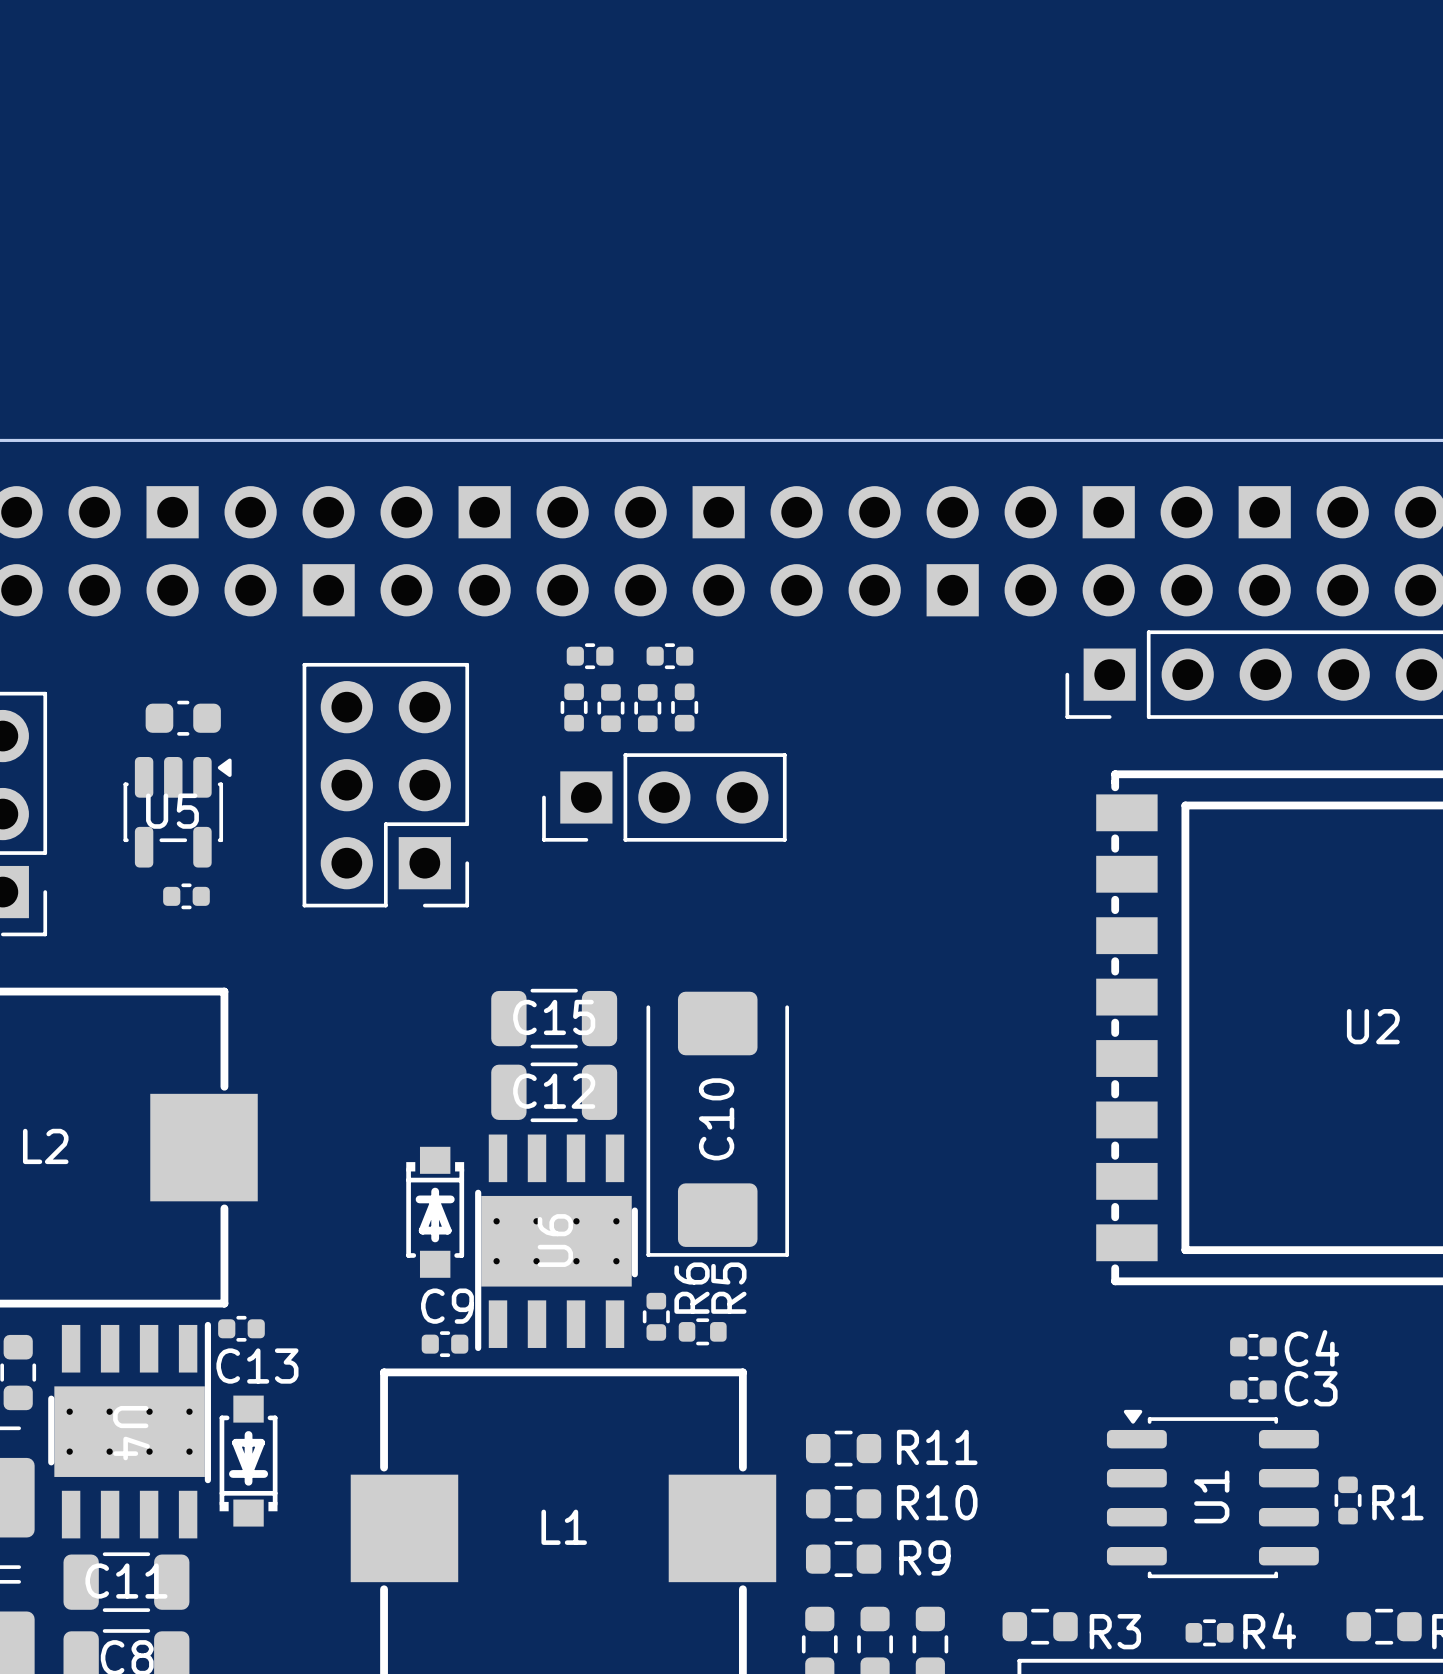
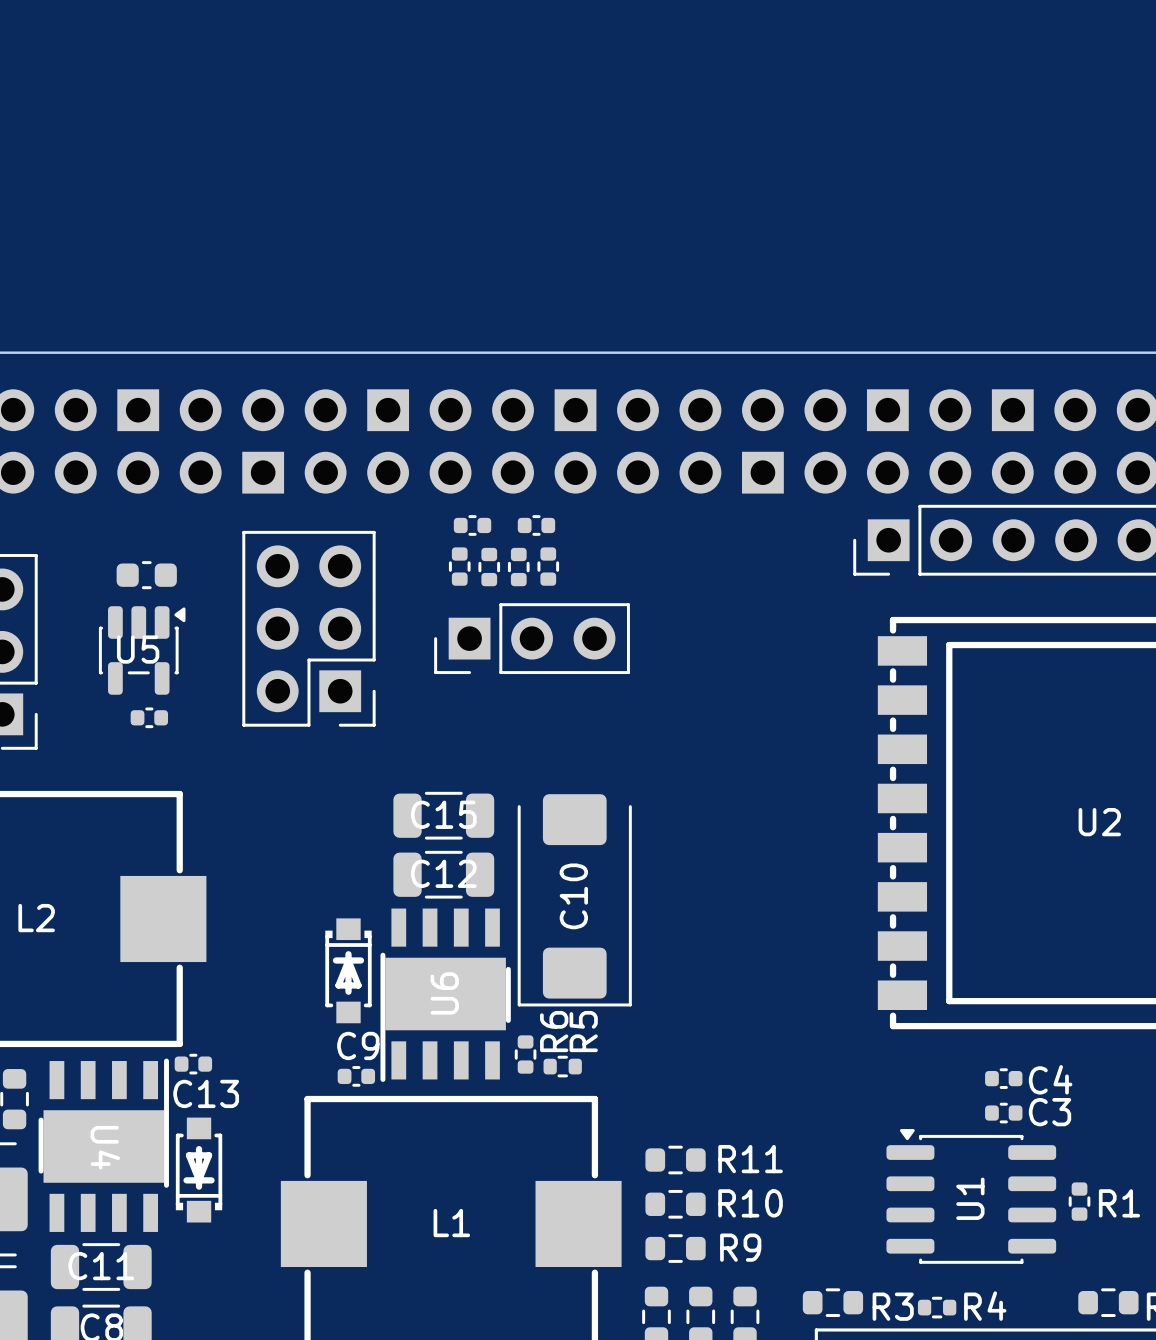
part footprint: [475, 1134, 638, 1352] -> [380, 908, 511, 1082]
part footprint: [48, 1321, 211, 1539] -> [38, 1058, 169, 1232]
R4 position: (1209, 1632) -> (937, 1307)

